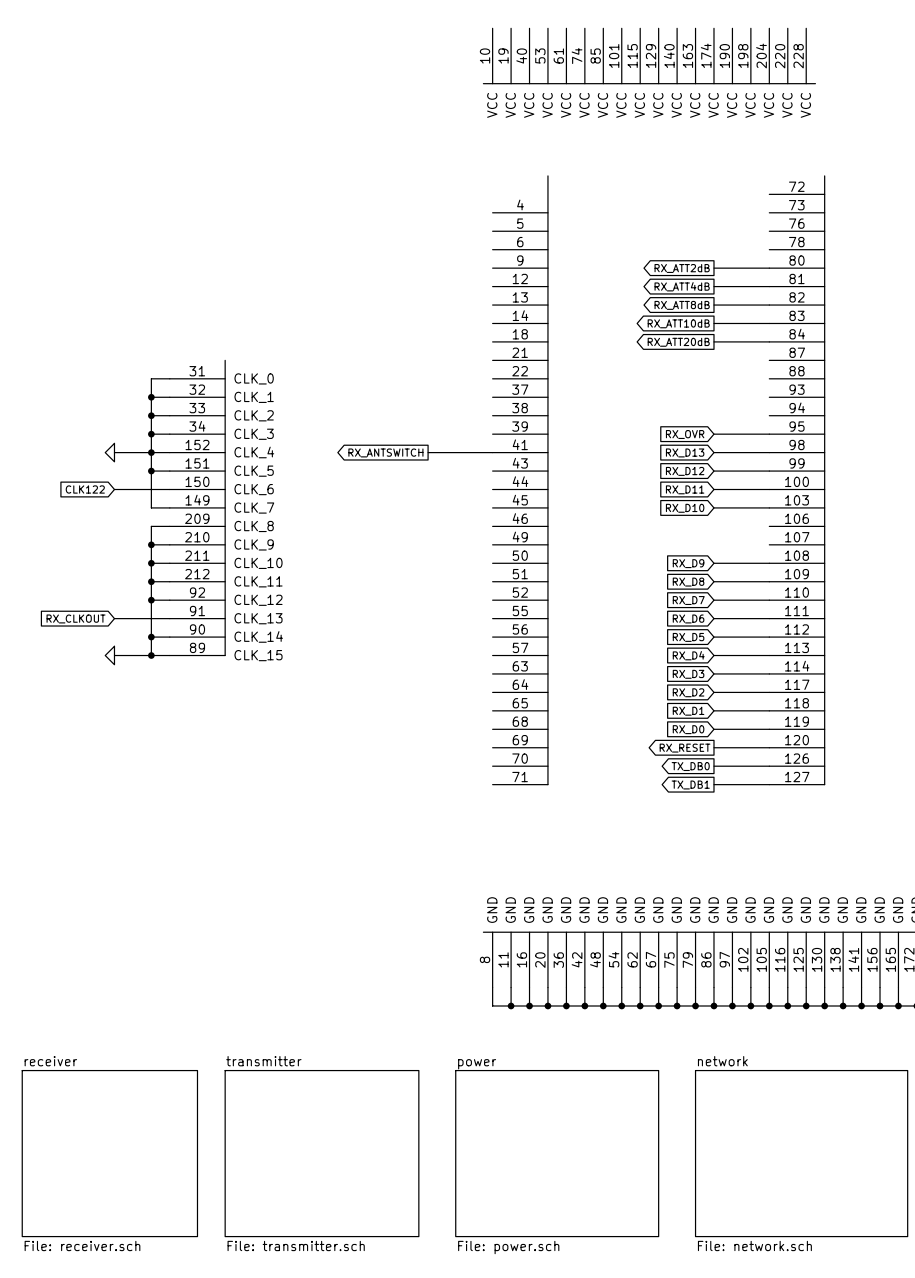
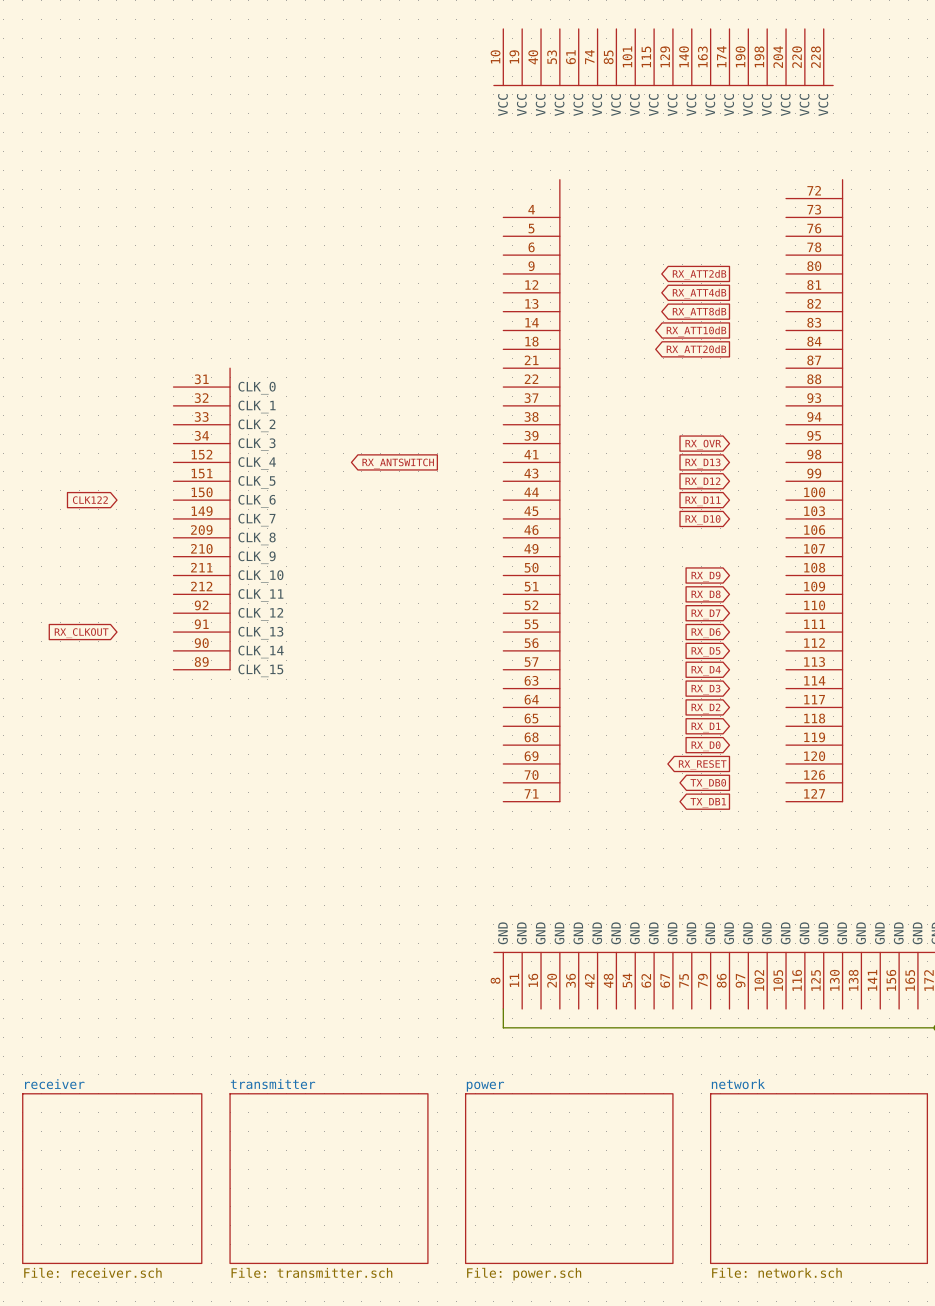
wire: (713, 268) (769, 268) -> none
wire: (713, 286) (769, 286) -> none
wire: (713, 305) (769, 305) -> none
wire: (713, 323) (769, 323) -> none
wire: (713, 341) (769, 341) -> none
wire: (169, 378) (151, 378) (151, 507) (169, 507) -> none
wire: (151, 397) (169, 397) -> none
junction: (151, 397) -> none
wire: (151, 415) (169, 415) -> none
junction: (151, 415) -> none
wire: (151, 434) (169, 434) -> none
junction: (151, 434) -> none
wire: (713, 434) (769, 434) -> none
power symbol: (109, 452) -> none
wire: (114, 452) (169, 452) -> none
junction: (151, 452) -> none
wire: (428, 452) (492, 452) -> none
wire: (713, 452) (769, 452) -> none
wire: (151, 471) (169, 471) -> none
junction: (151, 471) -> none
wire: (713, 471) (769, 471) -> none
wire: (114, 489) (169, 489) -> none
wire: (713, 489) (769, 489) -> none
wire: (713, 507) (769, 507) -> none
wire: (169, 526) (151, 526) (151, 655) -> none
wire: (151, 544) (169, 544) -> none
junction: (151, 544) -> none
wire: (151, 563) (169, 563) -> none
junction: (151, 563) -> none
wire: (713, 563) (769, 563) -> none
wire: (151, 581) (169, 581) -> none
junction: (151, 581) -> none
wire: (713, 581) (769, 581) -> none
wire: (151, 600) (169, 600) -> none
junction: (151, 600) -> none
wire: (713, 600) (769, 600) -> none
wire: (114, 618) (169, 618) -> none
wire: (713, 618) (769, 618) -> none
wire: (151, 637) (169, 637) -> none
junction: (151, 637) -> none
wire: (713, 637) (769, 637) -> none
power symbol: (109, 655) -> none
wire: (114, 655) (169, 655) -> none
junction: (151, 655) -> none
wire: (713, 655) (769, 655) -> none
wire: (713, 673) (769, 673) -> none
wire: (713, 692) (769, 692) -> none
wire: (713, 710) (769, 710) -> none
wire: (713, 729) (769, 729) -> none
wire: (713, 747) (769, 747) -> none
wire: (713, 766) (769, 766) -> none
wire: (713, 784) (769, 784) -> none
wire: (511, 987) (511, 1006) -> none
wire: (529, 987) (529, 1006) -> none
wire: (547, 987) (547, 1006) -> none
wire: (566, 987) (566, 1006) -> none
wire: (584, 987) (584, 1006) -> none
wire: (603, 987) (603, 1006) -> none
wire: (621, 987) (621, 1006) -> none
wire: (640, 987) (640, 1006) -> none
wire: (658, 987) (658, 1006) -> none
wire: (677, 987) (677, 1006) -> none
wire: (695, 987) (695, 1006) -> none
wire: (713, 987) (713, 1006) -> none
wire: (732, 987) (732, 1006) -> none
wire: (750, 987) (750, 1006) -> none
wire: (769, 987) (769, 1006) -> none
wire: (787, 987) (787, 1006) -> none
wire: (806, 987) (806, 1006) -> none
wire: (824, 987) (824, 1006) -> none
wire: (843, 987) (843, 1006) -> none
wire: (861, 987) (861, 1006) -> none
wire: (880, 987) (880, 1006) -> none
wire: (898, 987) (898, 1006) -> none
junction: (511, 1006) -> none
junction: (529, 1006) -> none
junction: (547, 1006) -> none
junction: (566, 1006) -> none
junction: (584, 1006) -> none
junction: (603, 1006) -> none
junction: (621, 1006) -> none
junction: (640, 1006) -> none
junction: (658, 1006) -> none
junction: (677, 1006) -> none
junction: (695, 1006) -> none
junction: (713, 1006) -> none
junction: (732, 1006) -> none
junction: (750, 1006) -> none
junction: (769, 1006) -> none
junction: (787, 1006) -> none
junction: (806, 1006) -> none
junction: (824, 1006) -> none
junction: (843, 1006) -> none
junction: (861, 1006) -> none
junction: (880, 1006) -> none
junction: (898, 1006) -> none

